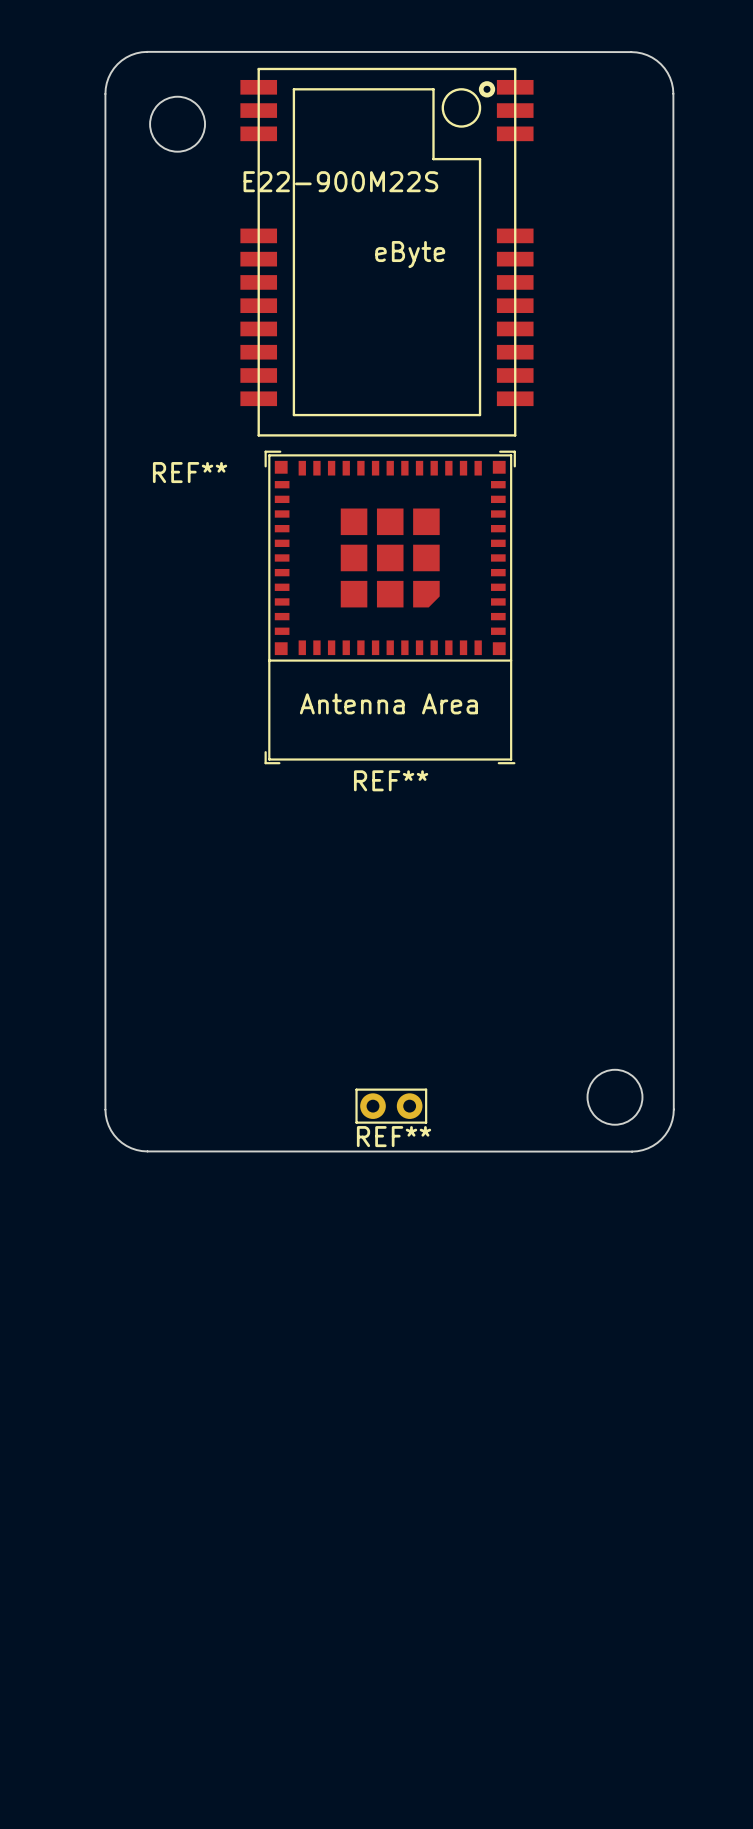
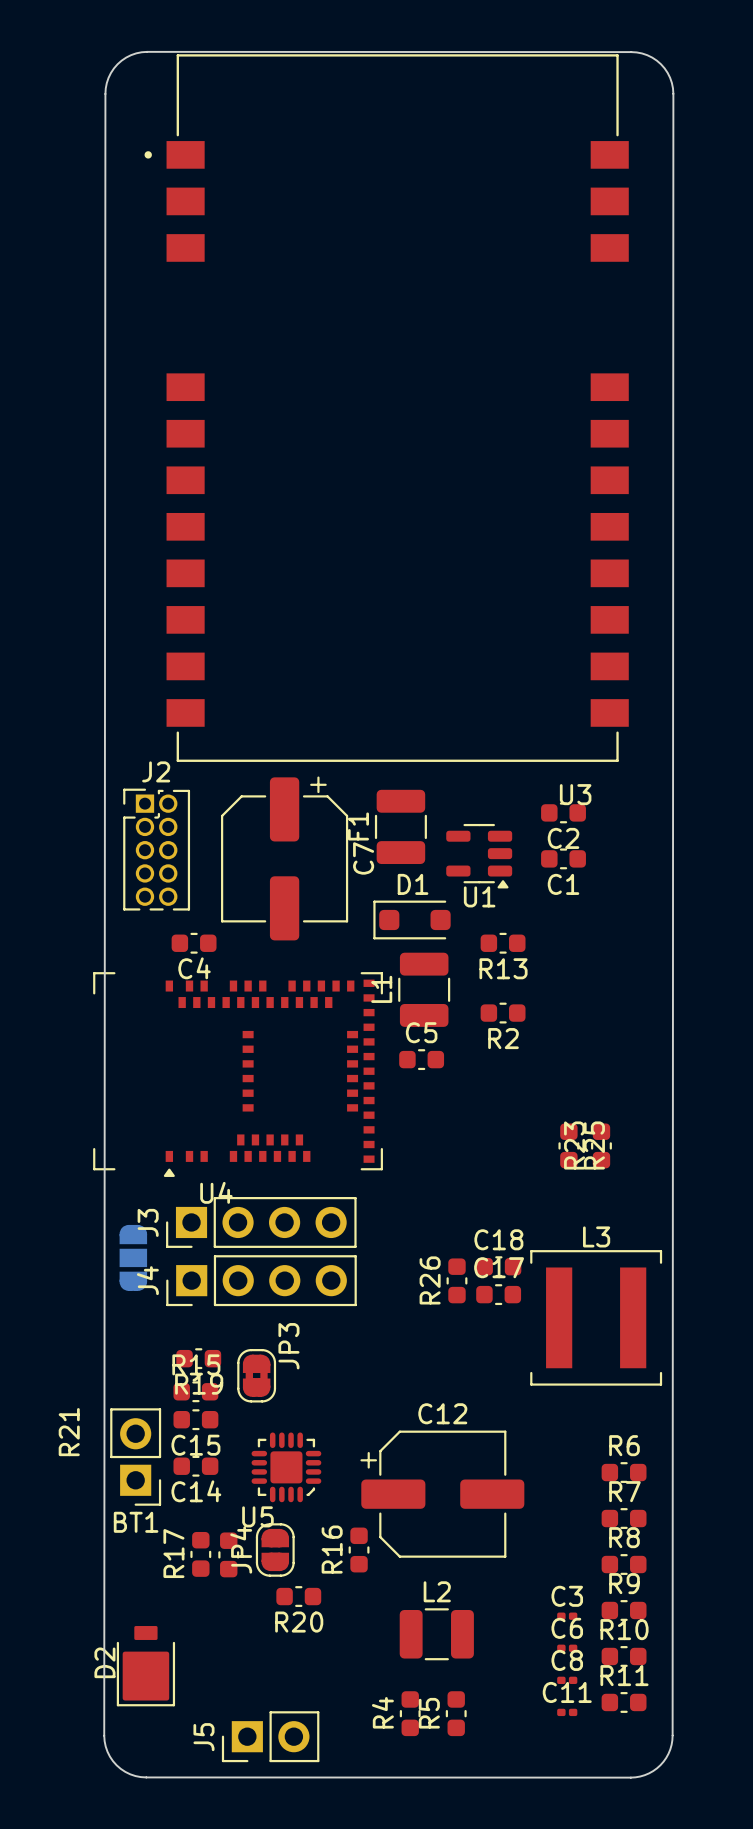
board edge: (673, 93) (673, 1109) (670, 1125) (661, 1139) (648, 1148) (632, 1151) (147, 1151) (136, 1150) (121, 1142) (108, 1125) (105, 1109) (105, 93) -> (673, 93) (672, 1735) (668, 1753) (660, 1765) (649, 1773) (630, 1777) (146, 1777) (130, 1774) (120, 1768) (109, 1756) (105, 1746) (105, 93)
round board edge: [149, 96, 206, 153] -> none
REF**: (386, 252) -> none
U3: none -> (386, 408)
REF**: (390, 607) -> none
C2: none -> (563, 812)
F1: none -> (400, 826)
J2: none -> (156, 849)
U1: none -> (479, 856)
C7: none -> (284, 858)
C1: none -> (563, 858)
D1: none -> (412, 919)
C4: none -> (194, 943)
R13: none -> (503, 943)
L1: none -> (424, 989)
R2: none -> (503, 1013)
C5: none -> (421, 1059)
round board edge: [587, 1069, 643, 1126] -> none
U4: none -> (238, 1074)
REF**: (391, 1106) -> none
R25: none -> (568, 1145)
R23: none -> (601, 1145)
J3: none -> (261, 1222)
part: none -> (133, 1257)
C18: none -> (498, 1266)
J4: none -> (261, 1280)
R26: none -> (456, 1280)
C17: none -> (498, 1294)
L3: none -> (596, 1317)
R19: none -> (198, 1358)
JP3: none -> (256, 1375)
R15: none -> (195, 1391)
C15: none -> (195, 1419)
BT1: none -> (135, 1457)
C14: none -> (195, 1466)
U5: none -> (286, 1467)
R6: none -> (624, 1472)
C12: none -> (442, 1494)
R7: none -> (624, 1518)
JP4: none -> (275, 1550)
R16: none -> (359, 1550)
R17: none -> (200, 1554)
R21: none -> (228, 1554)
R8: none -> (624, 1564)
R20: none -> (298, 1596)
R9: none -> (624, 1610)
C3: none -> (567, 1616)
L2: none -> (436, 1634)
C6: none -> (567, 1648)
R10: none -> (624, 1656)
D2: none -> (145, 1666)
C8: none -> (567, 1680)
R11: none -> (624, 1702)
C11: none -> (567, 1712)
R4: none -> (410, 1713)
R5: none -> (456, 1713)
J5: none -> (270, 1736)

